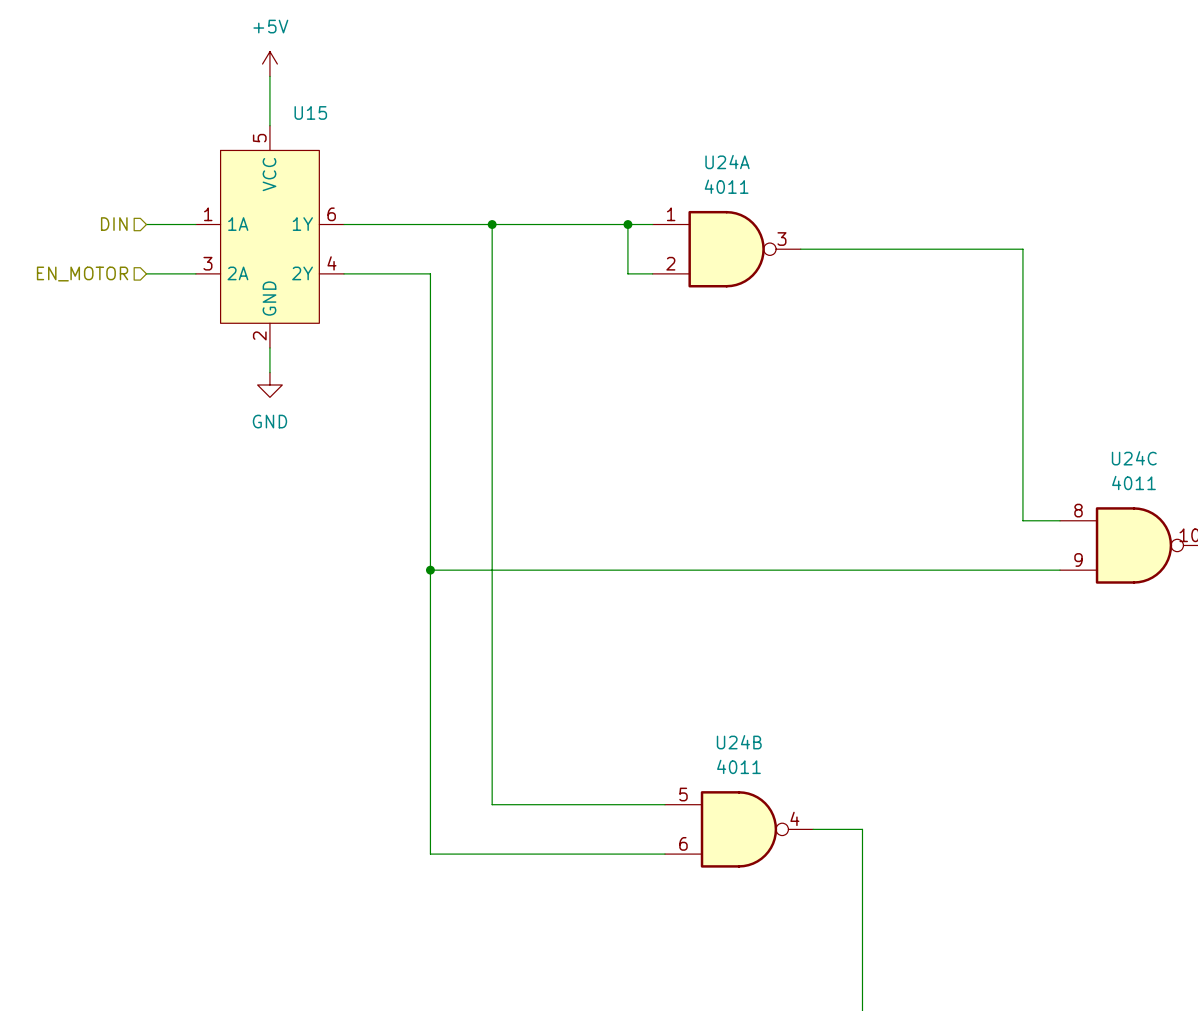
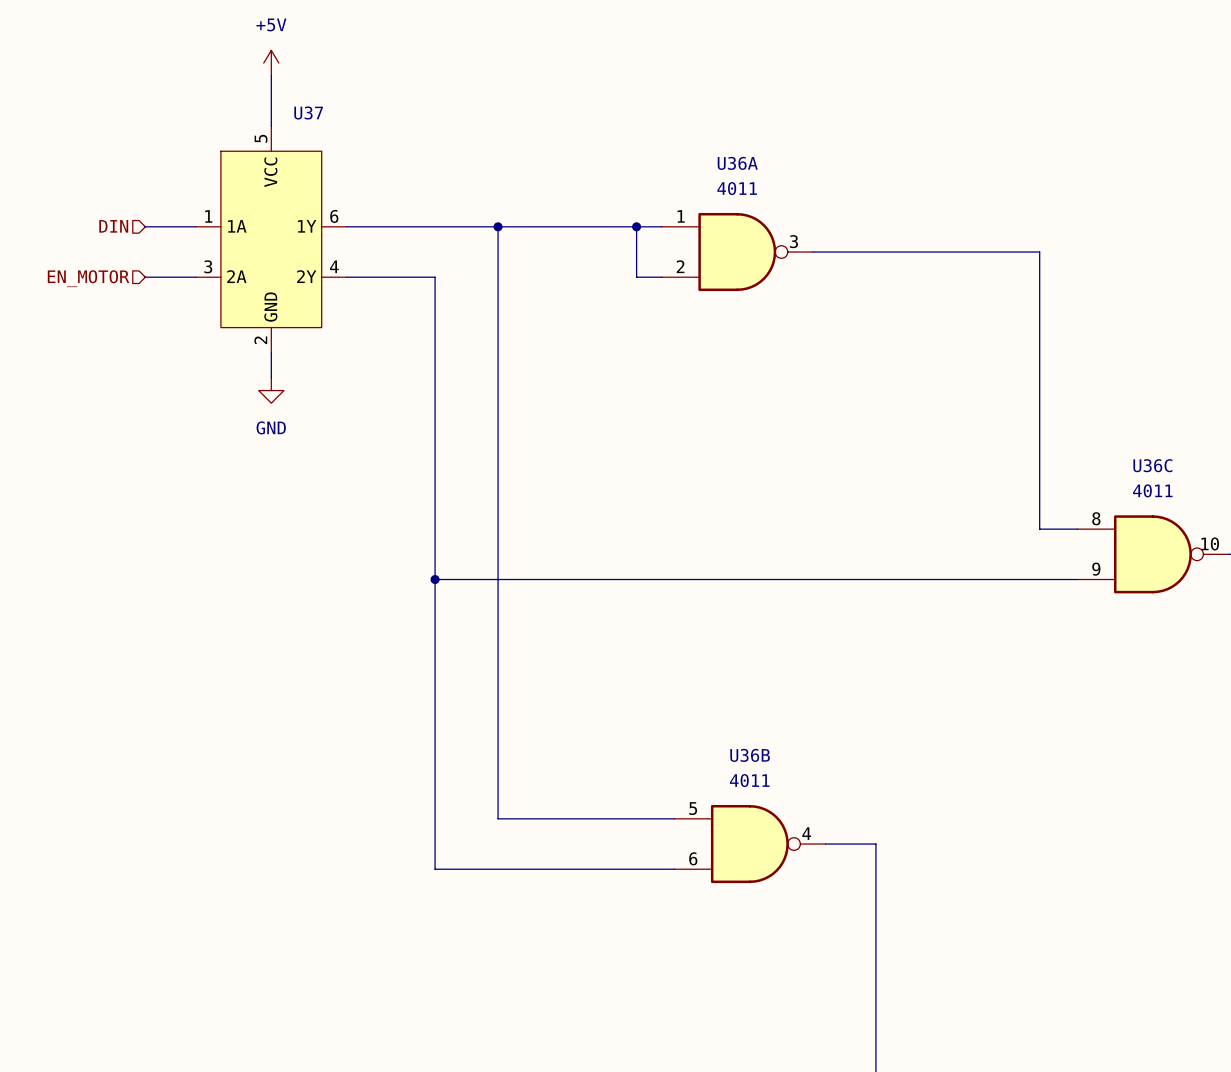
U15 name: U15 (310, 112) -> U37 (308, 112)
U24A name: U24A (727, 162) -> U36A (737, 163)
U24C name: U24C (1134, 458) -> U36C (1152, 465)
U24B name: U24B (739, 742) -> U36B (750, 755)

